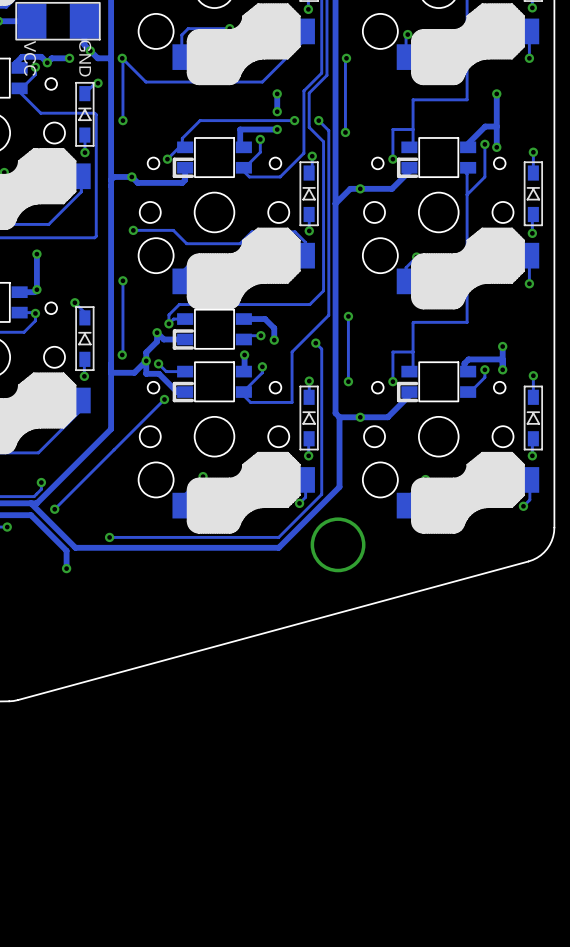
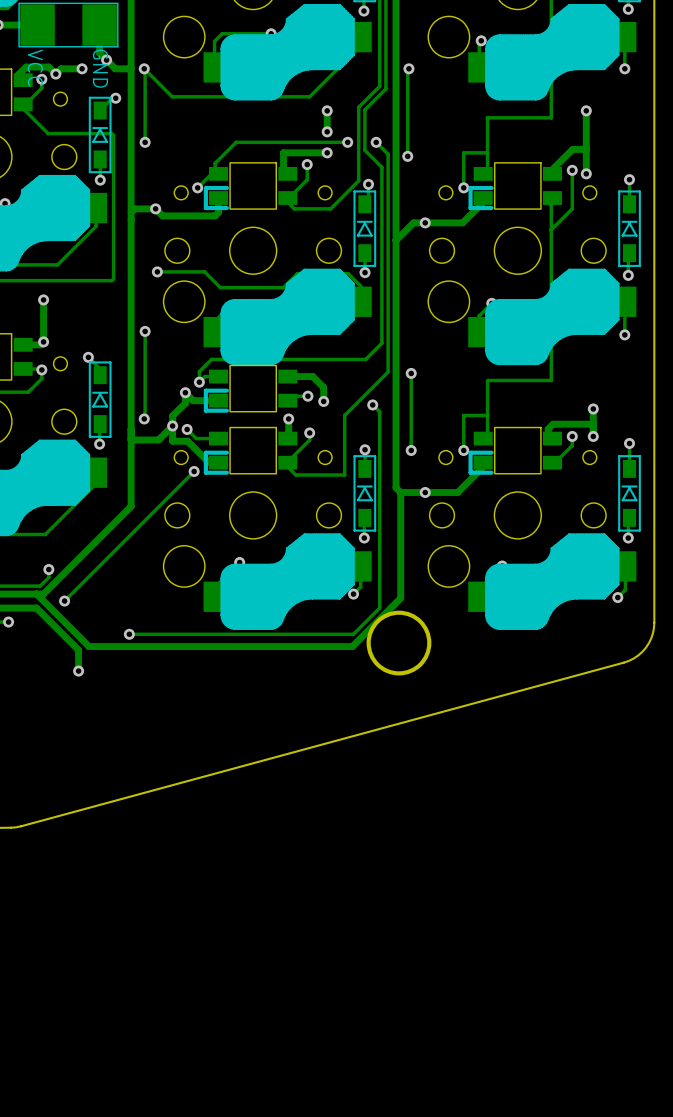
track: (339, 486) (278, 547) -> (400, 574) (400, 598) (352, 646) (328, 646)
track: (321, 494) (278, 537) -> (379, 583) (379, 608) (353, 634) (328, 634)

